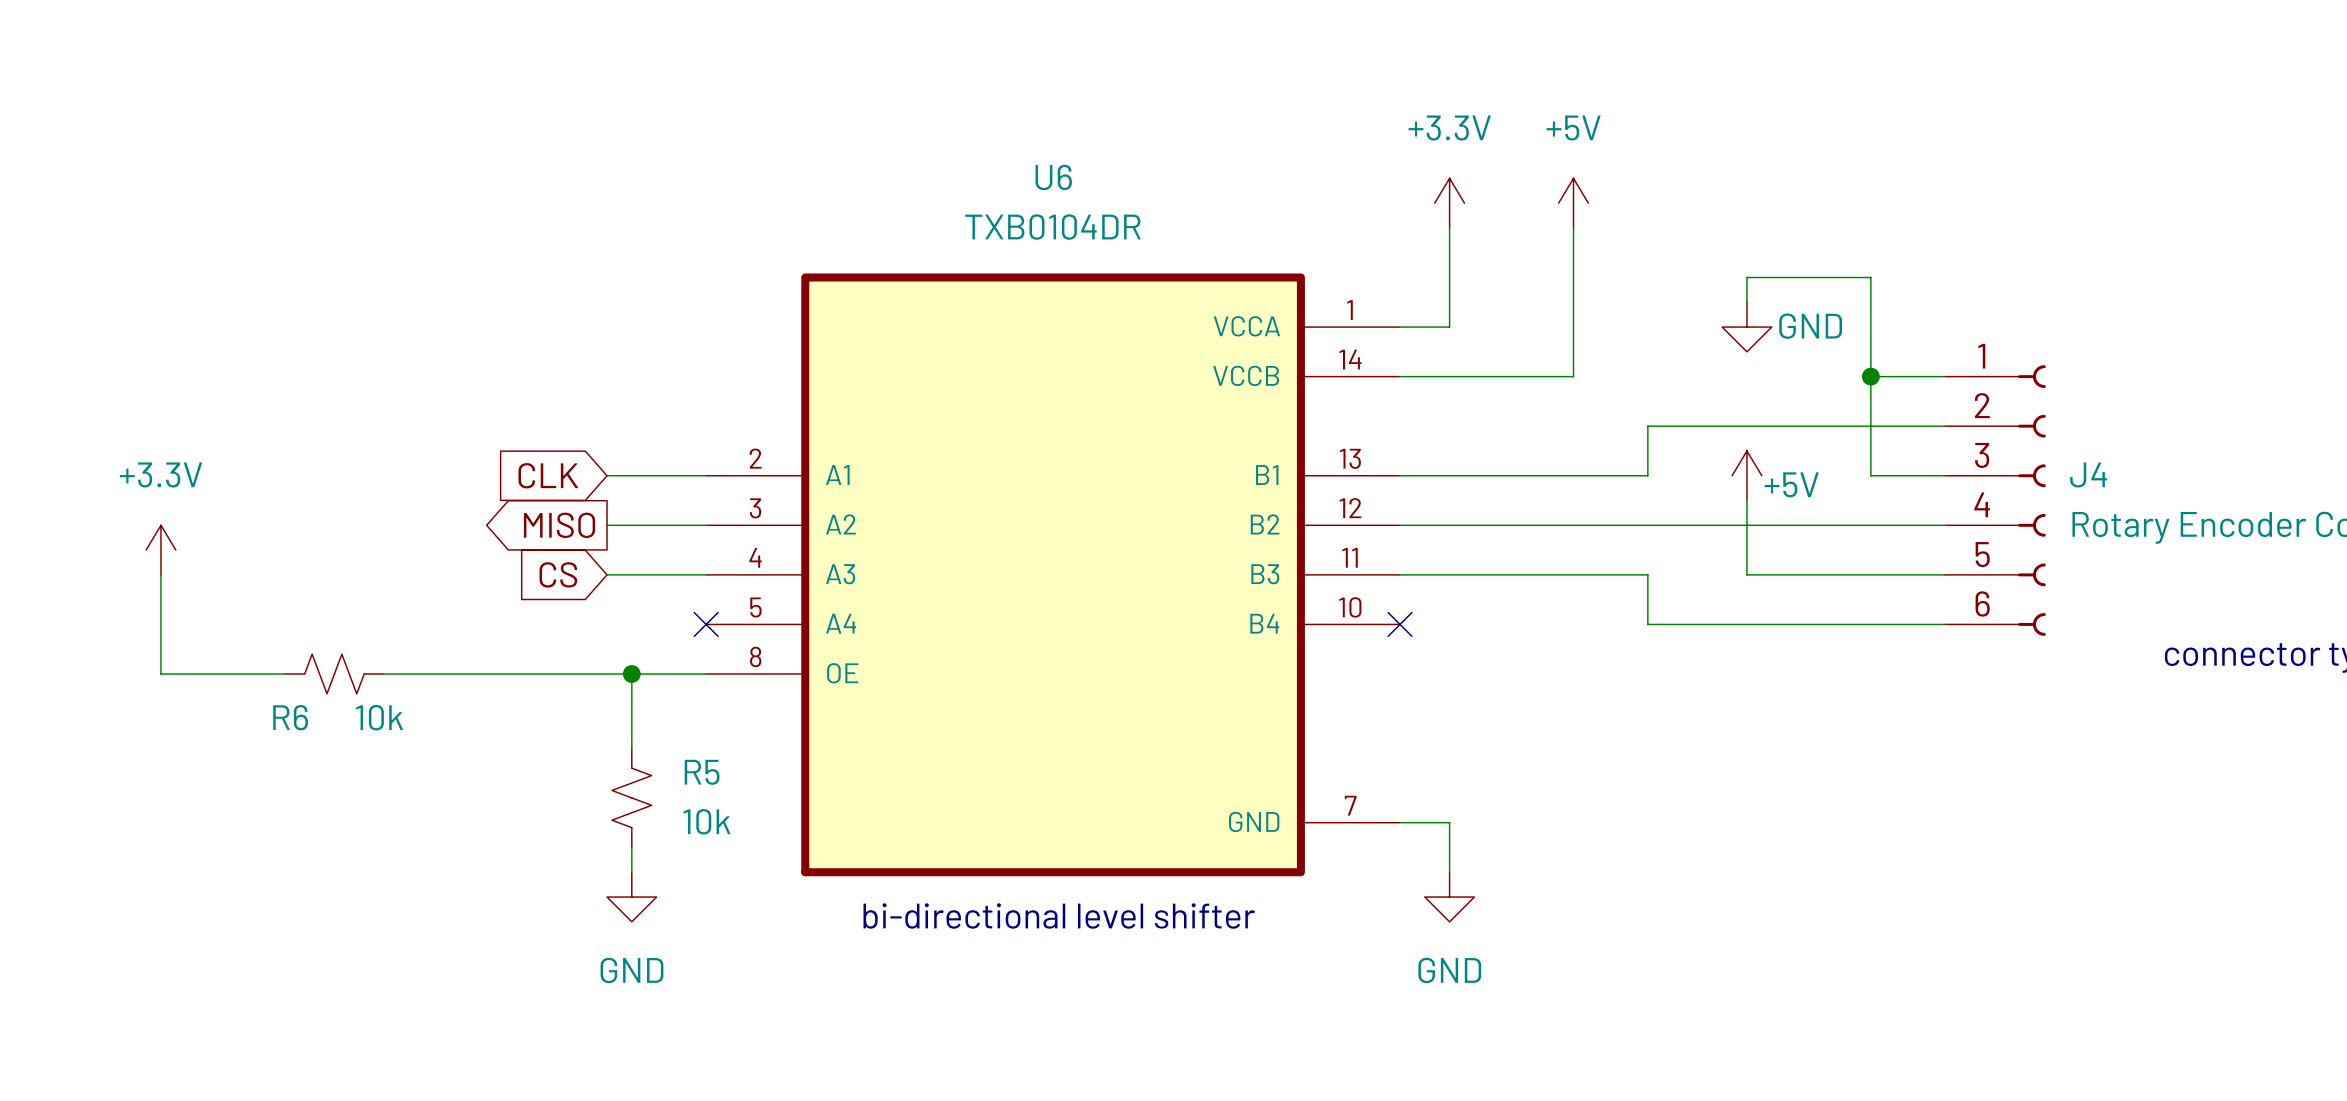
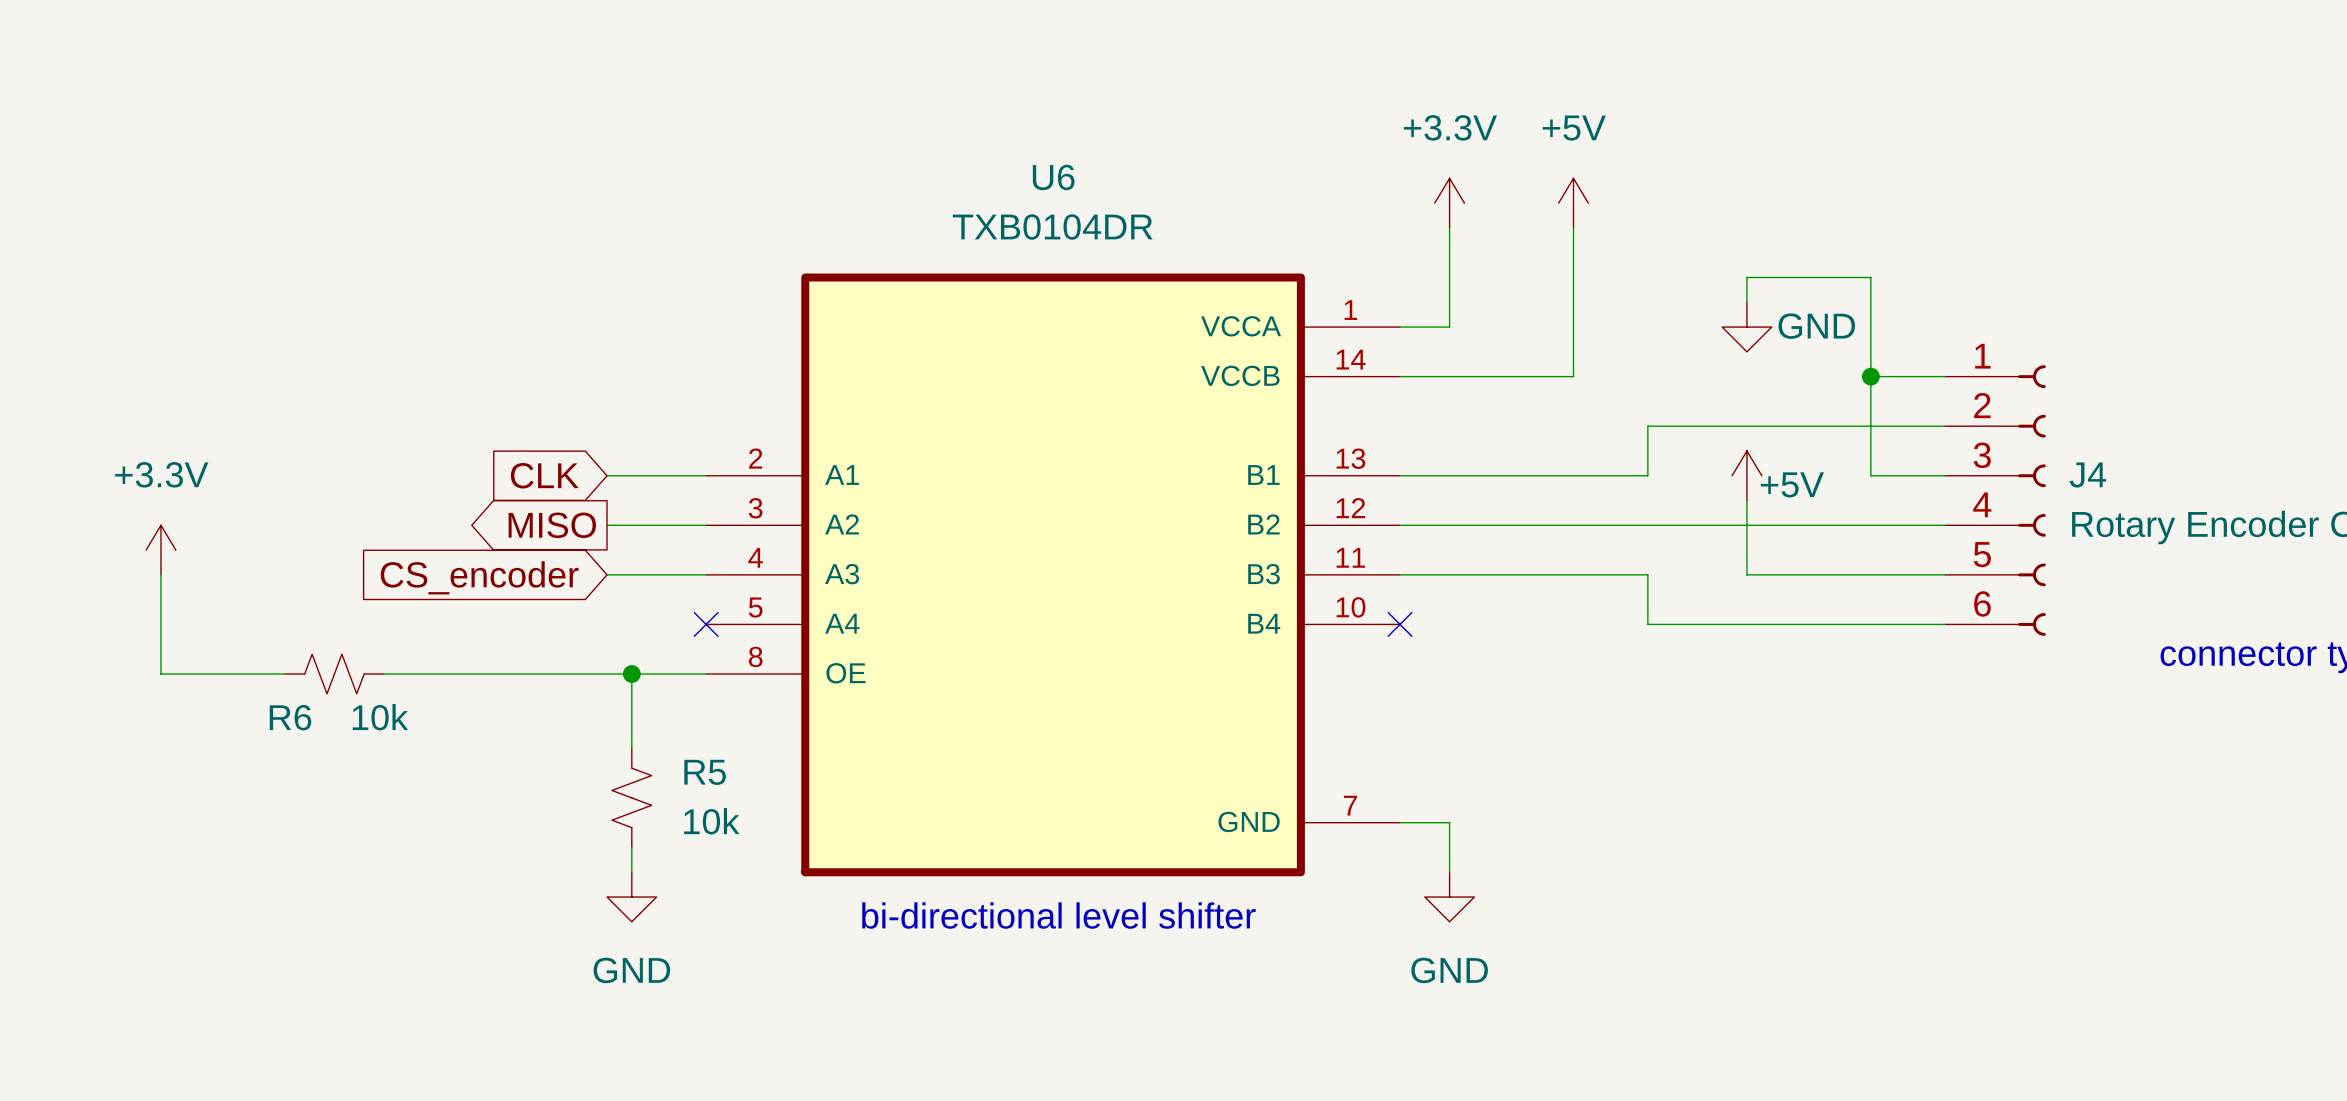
global label: CS (558, 574) -> CS_encoder (479, 577)

